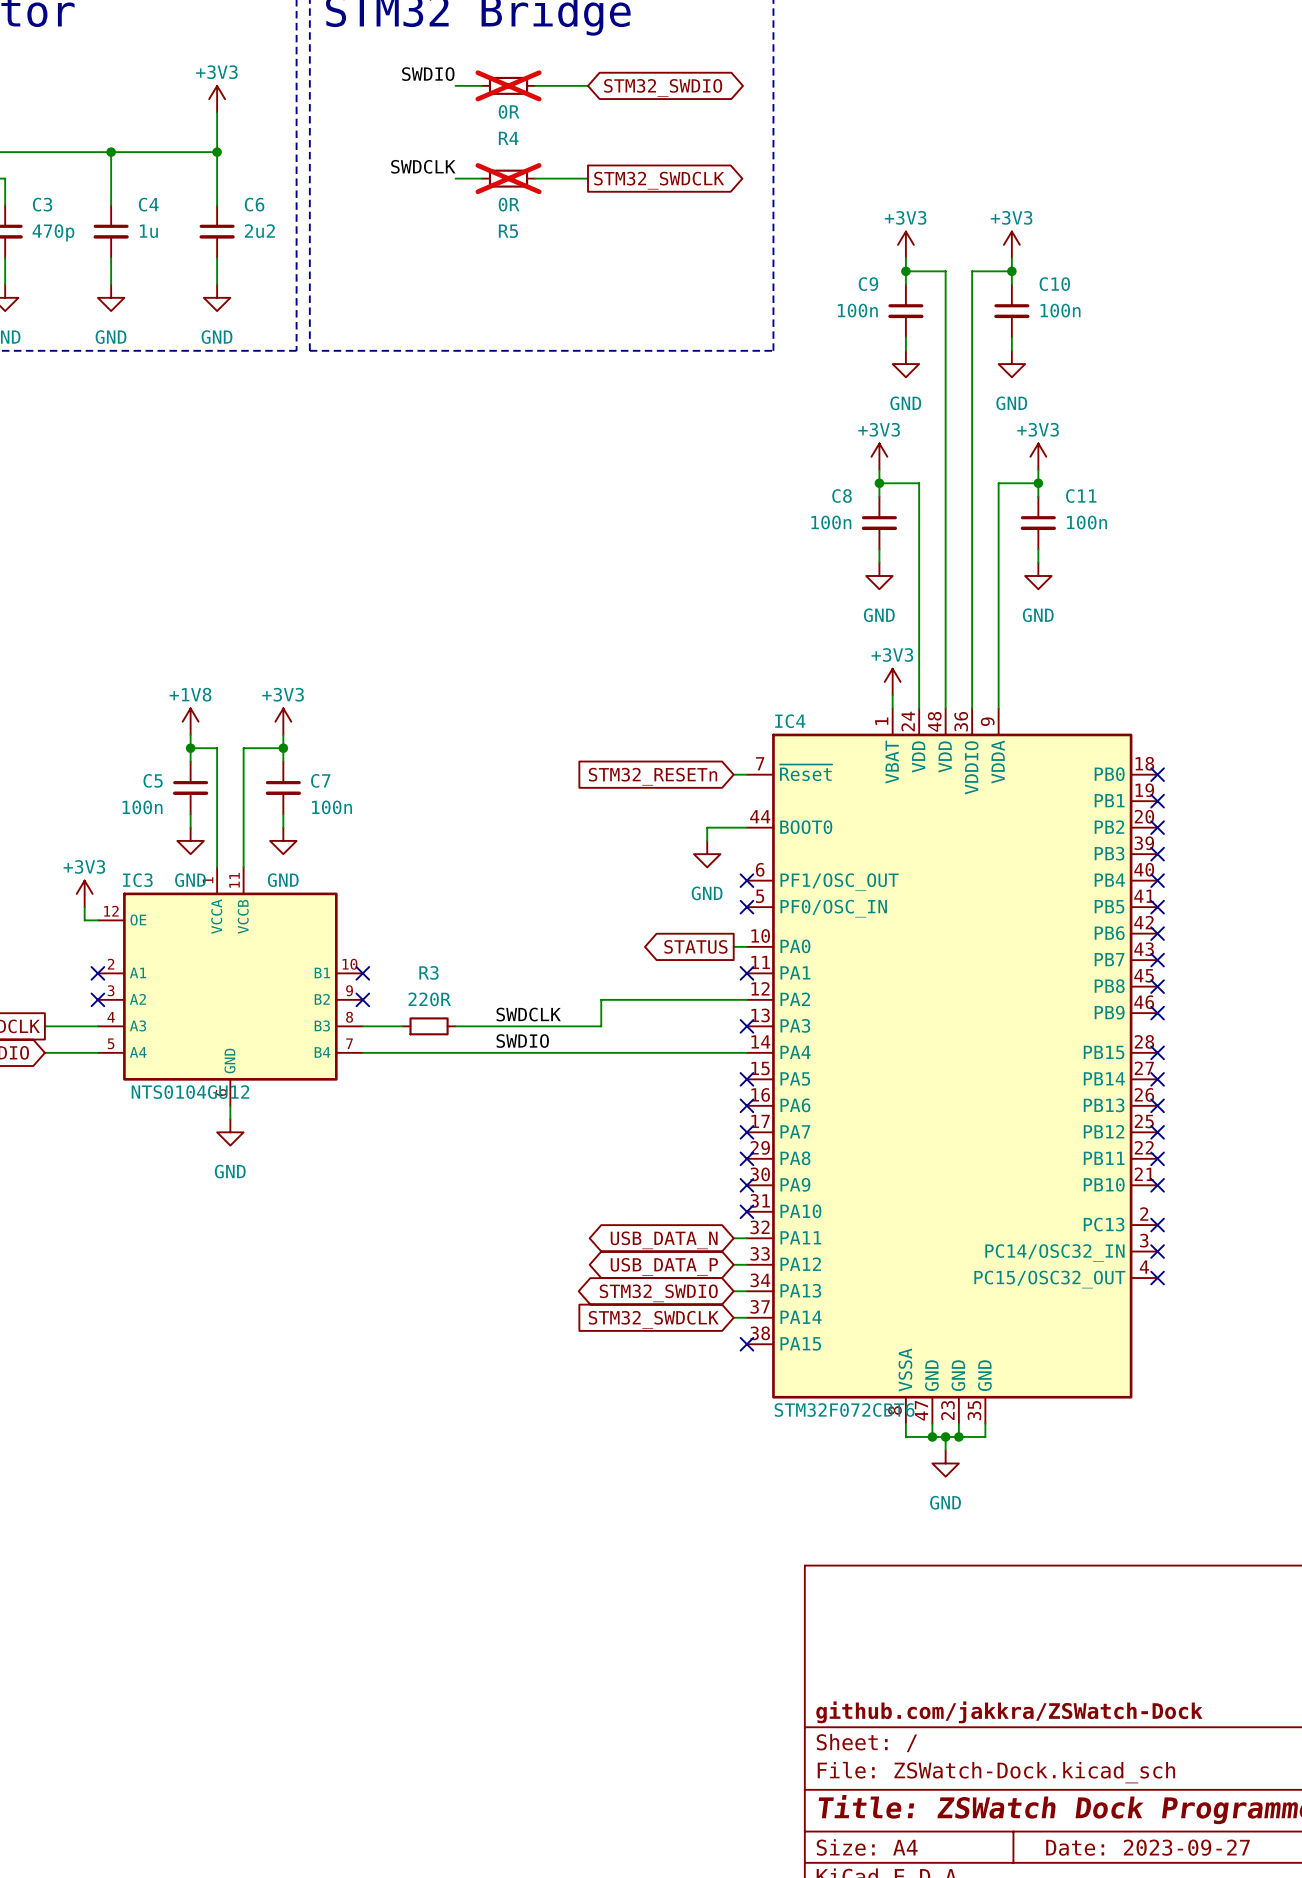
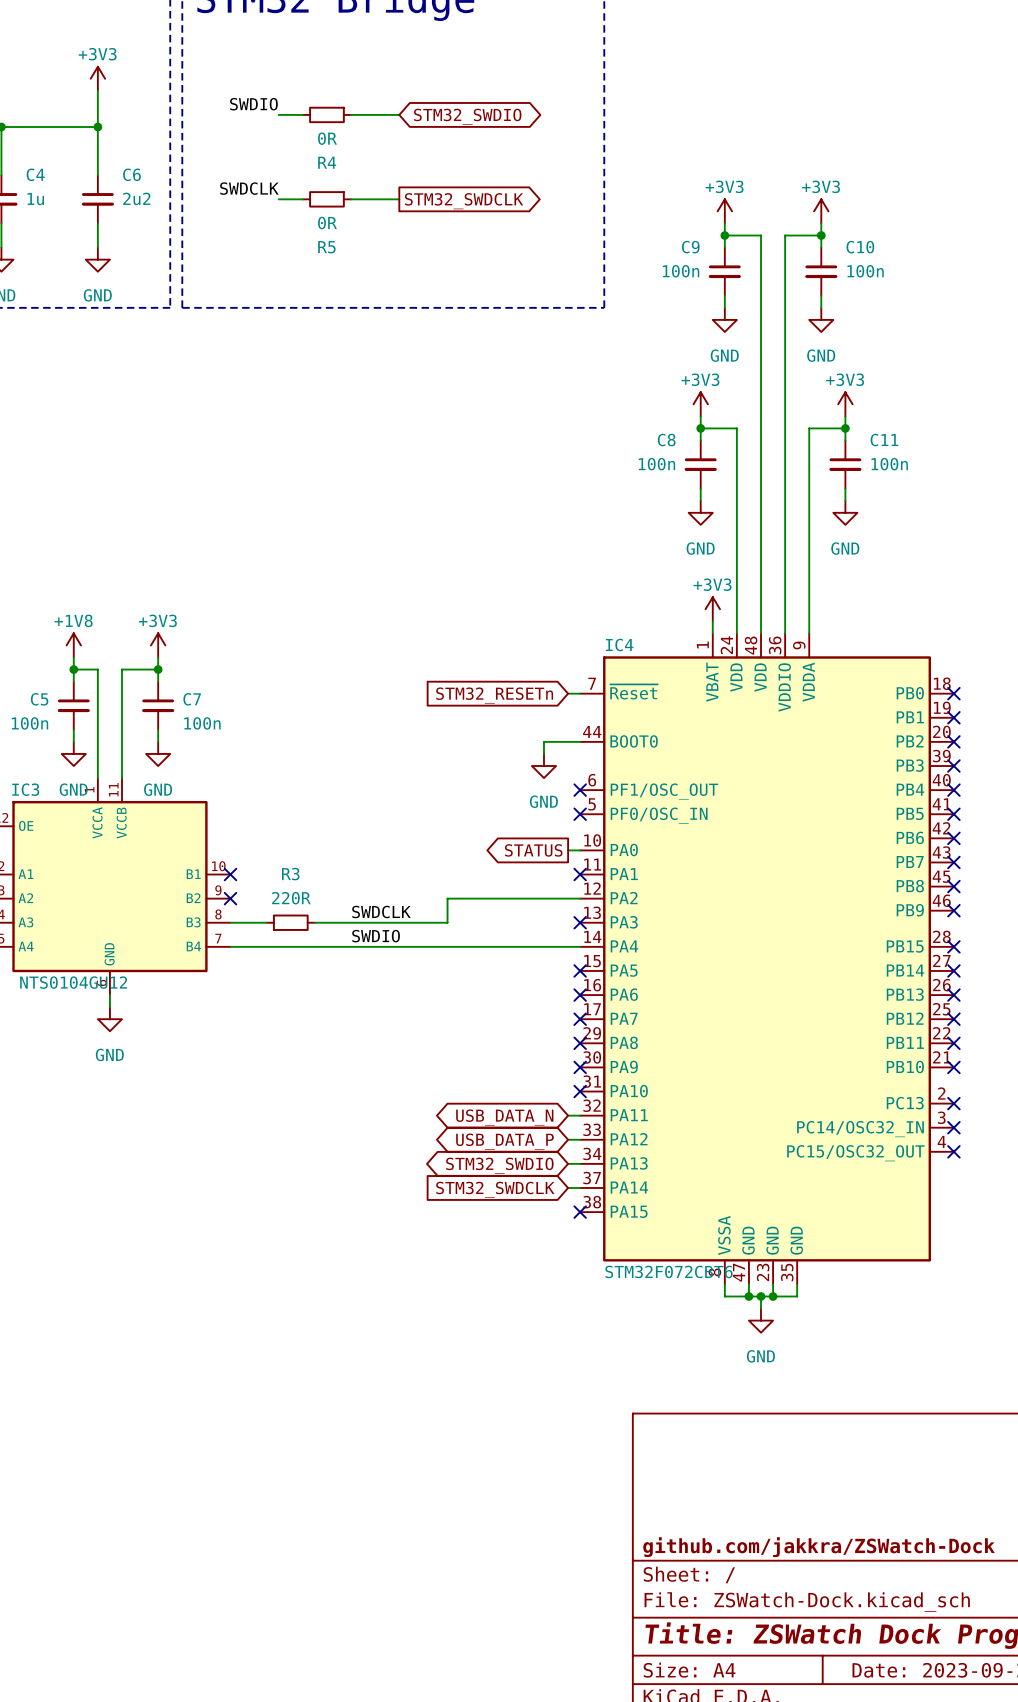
label position: SWDIO (428, 74) -> SWDIO (253, 104)
wire: (455, 85) (482, 85) -> (278, 199) (302, 199)
R4 position: (508, 85) -> (326, 114)
R4 do-not-place cross: (508, 85) -> none
wire: (535, 85) (588, 85) -> (351, 199) (399, 199)
global label position: STM32_SWDIO (663, 87) -> STM32_SWDIO (467, 116)
label position: SWDCLK (423, 166) -> SWDCLK (249, 188)
wire: (455, 178) (482, 178) -> (278, 114) (302, 114)
R5 position: (508, 178) -> (326, 199)
R5 do-not-place cross: (508, 178) -> none
wire: (535, 178) (588, 178) -> (351, 114) (399, 114)
global label position: STM32_SWDCLK (659, 180) -> STM32_SWDCLK (464, 201)

